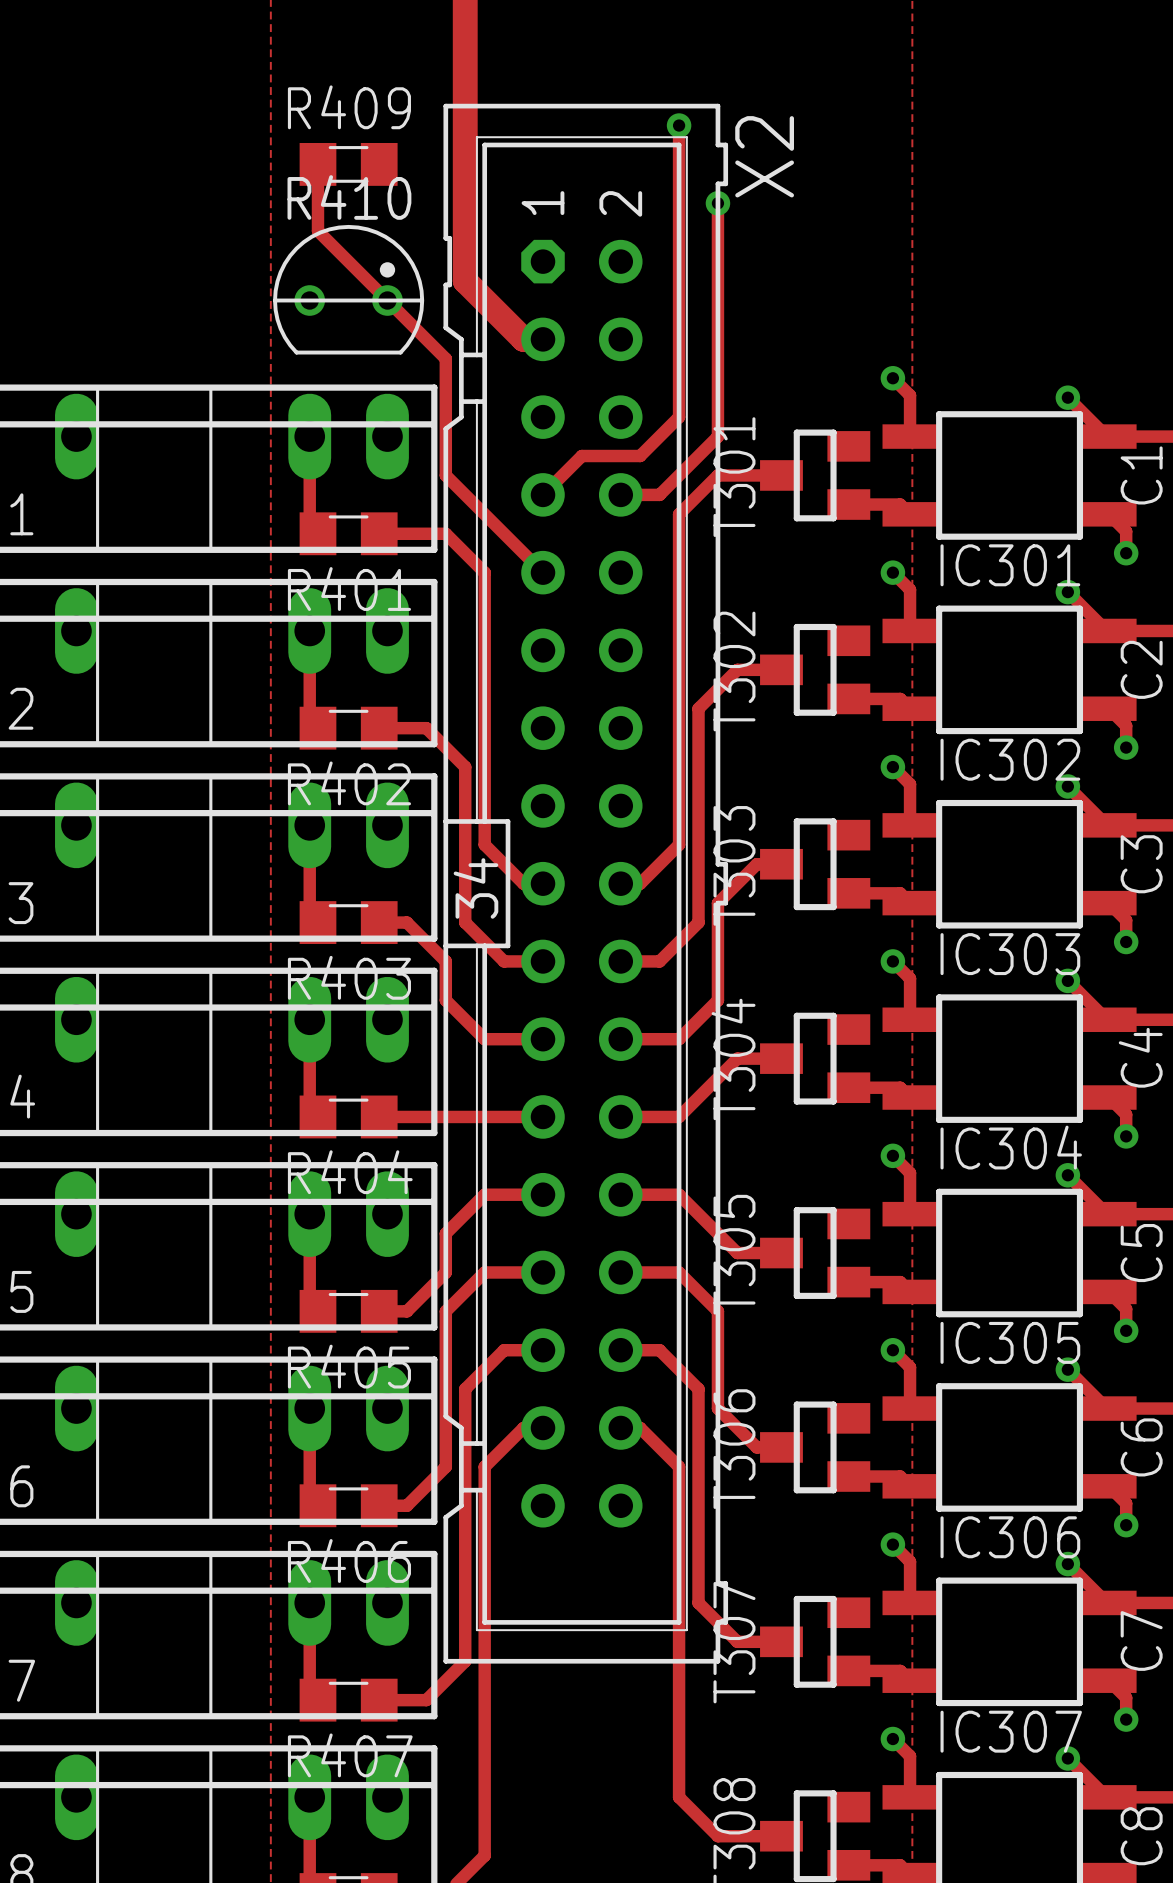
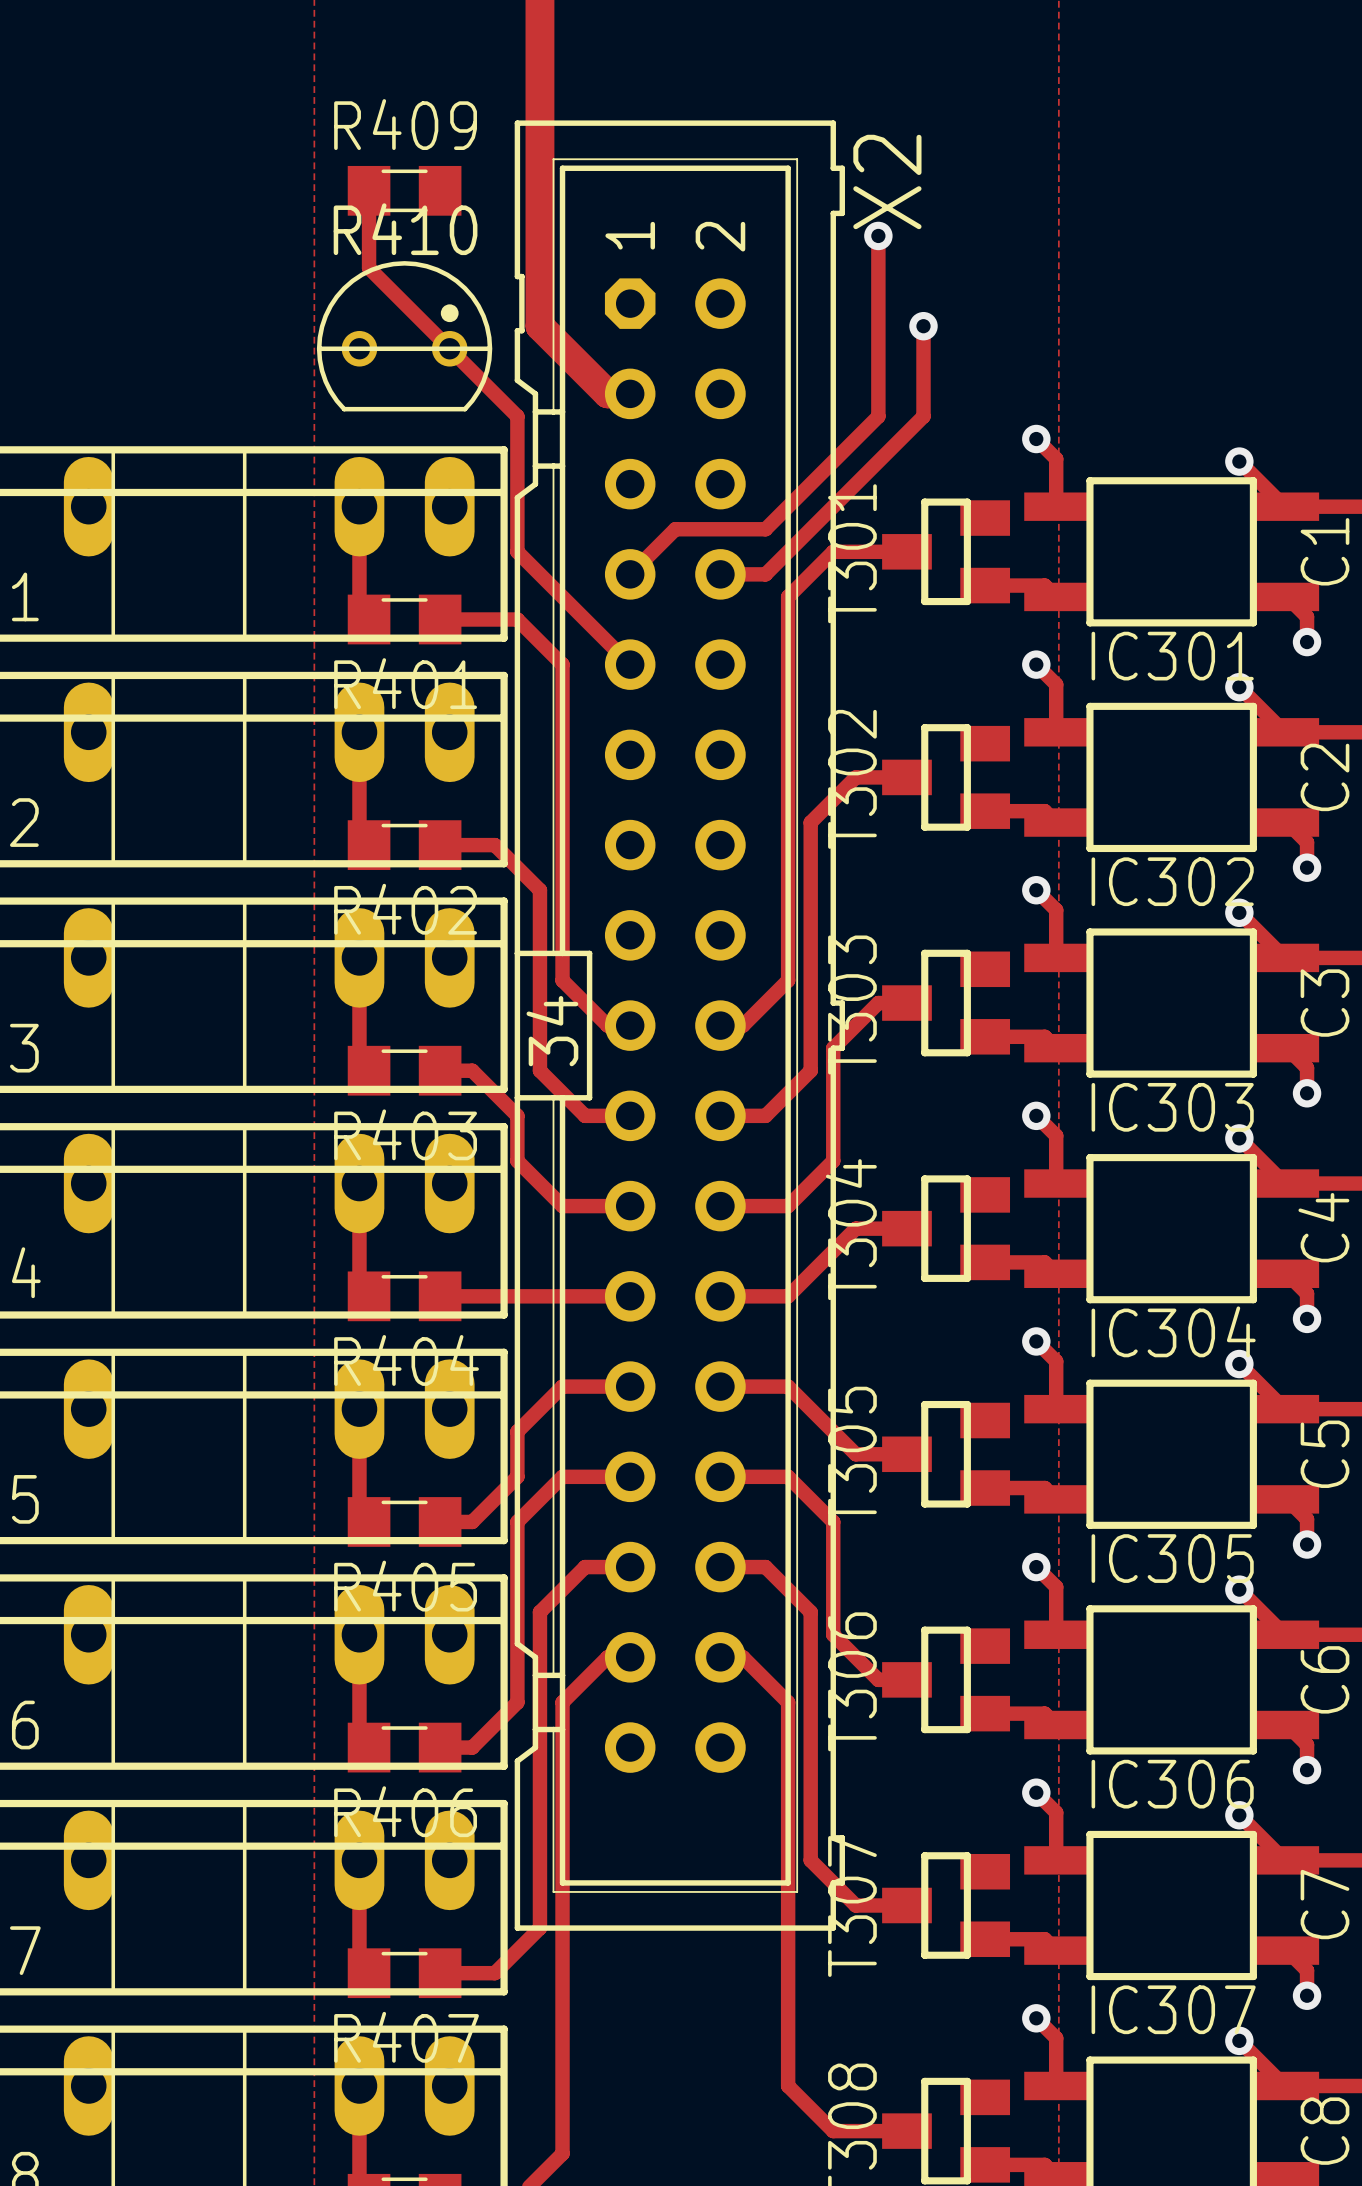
track: (679, 125) (679, 417) (640, 456) -> (878, 235) (878, 416) (765, 529) (743, 529)
via: (679, 125) -> none
track: (717, 203) (717, 436) -> (923, 326) (923, 416) (833, 506)
via position: (717, 203) -> (878, 235)
via: none -> (923, 326)

